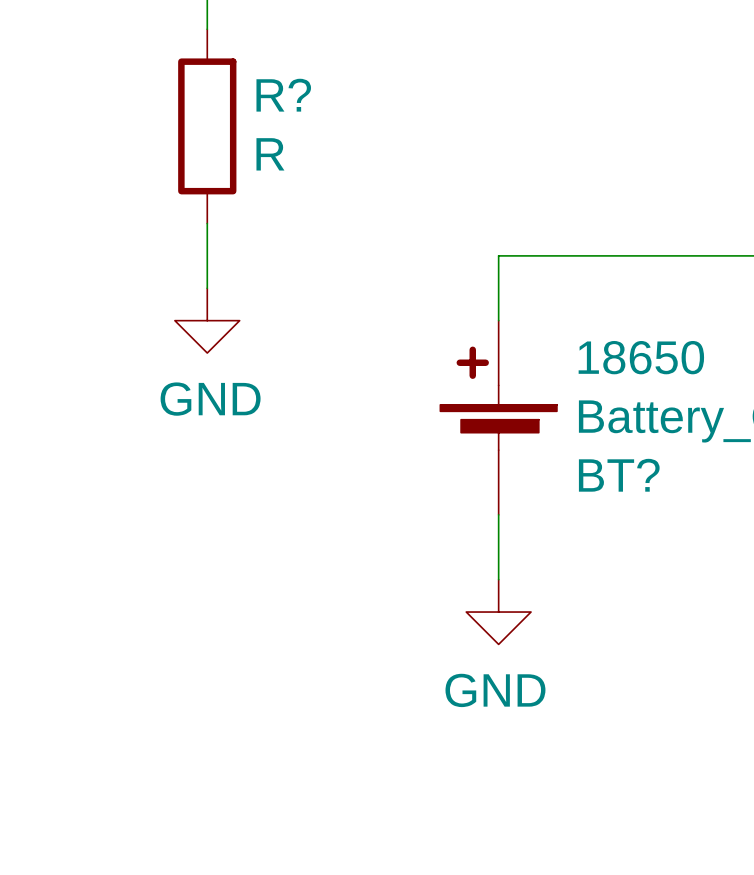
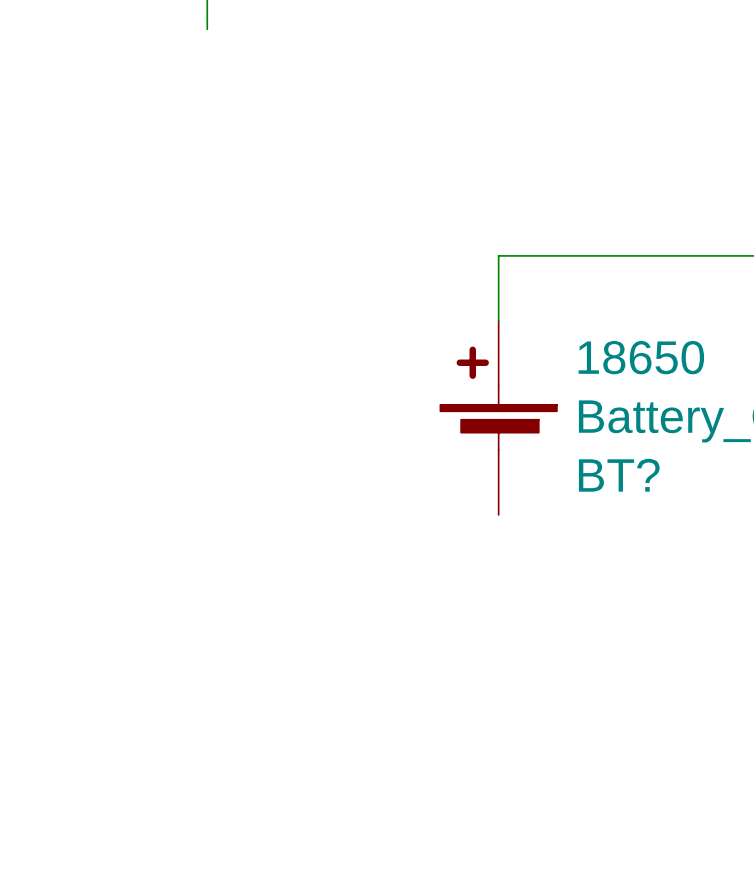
R?: R (207, 126) -> none
wire: (207, 223) (207, 288) -> none
power symbol: GND (207, 320) -> none
wire: (498, 514) (498, 579) -> none
power symbol: GND (498, 612) -> none

